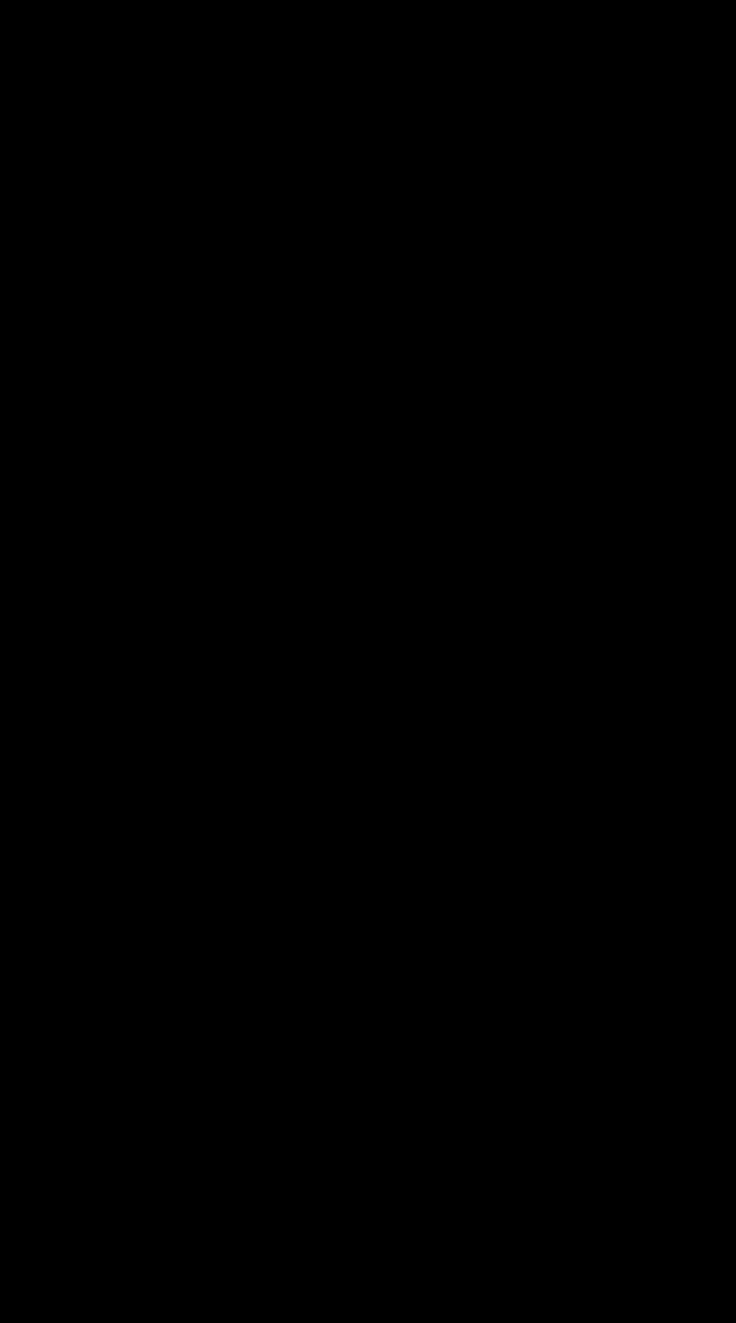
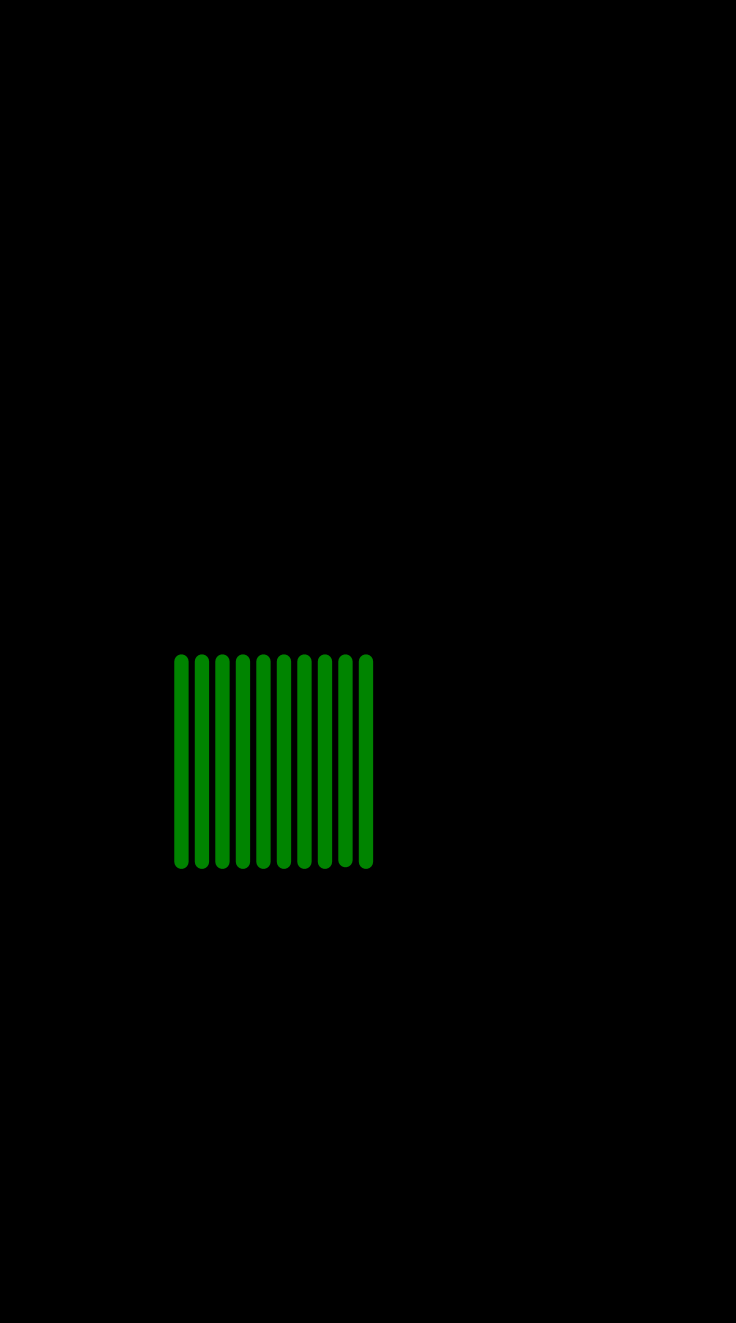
bottom track: none -> (181, 661) (181, 861)
bottom track: none -> (201, 661) (201, 861)
bottom track: none -> (222, 661) (222, 861)
bottom track: none -> (242, 661) (242, 861)
bottom track: none -> (263, 661) (263, 861)
bottom track: none -> (283, 661) (283, 861)
bottom track: none -> (304, 661) (304, 861)
bottom track: none -> (324, 661) (324, 861)
bottom track: none -> (345, 661) (345, 860)
bottom track: none -> (365, 661) (365, 861)

